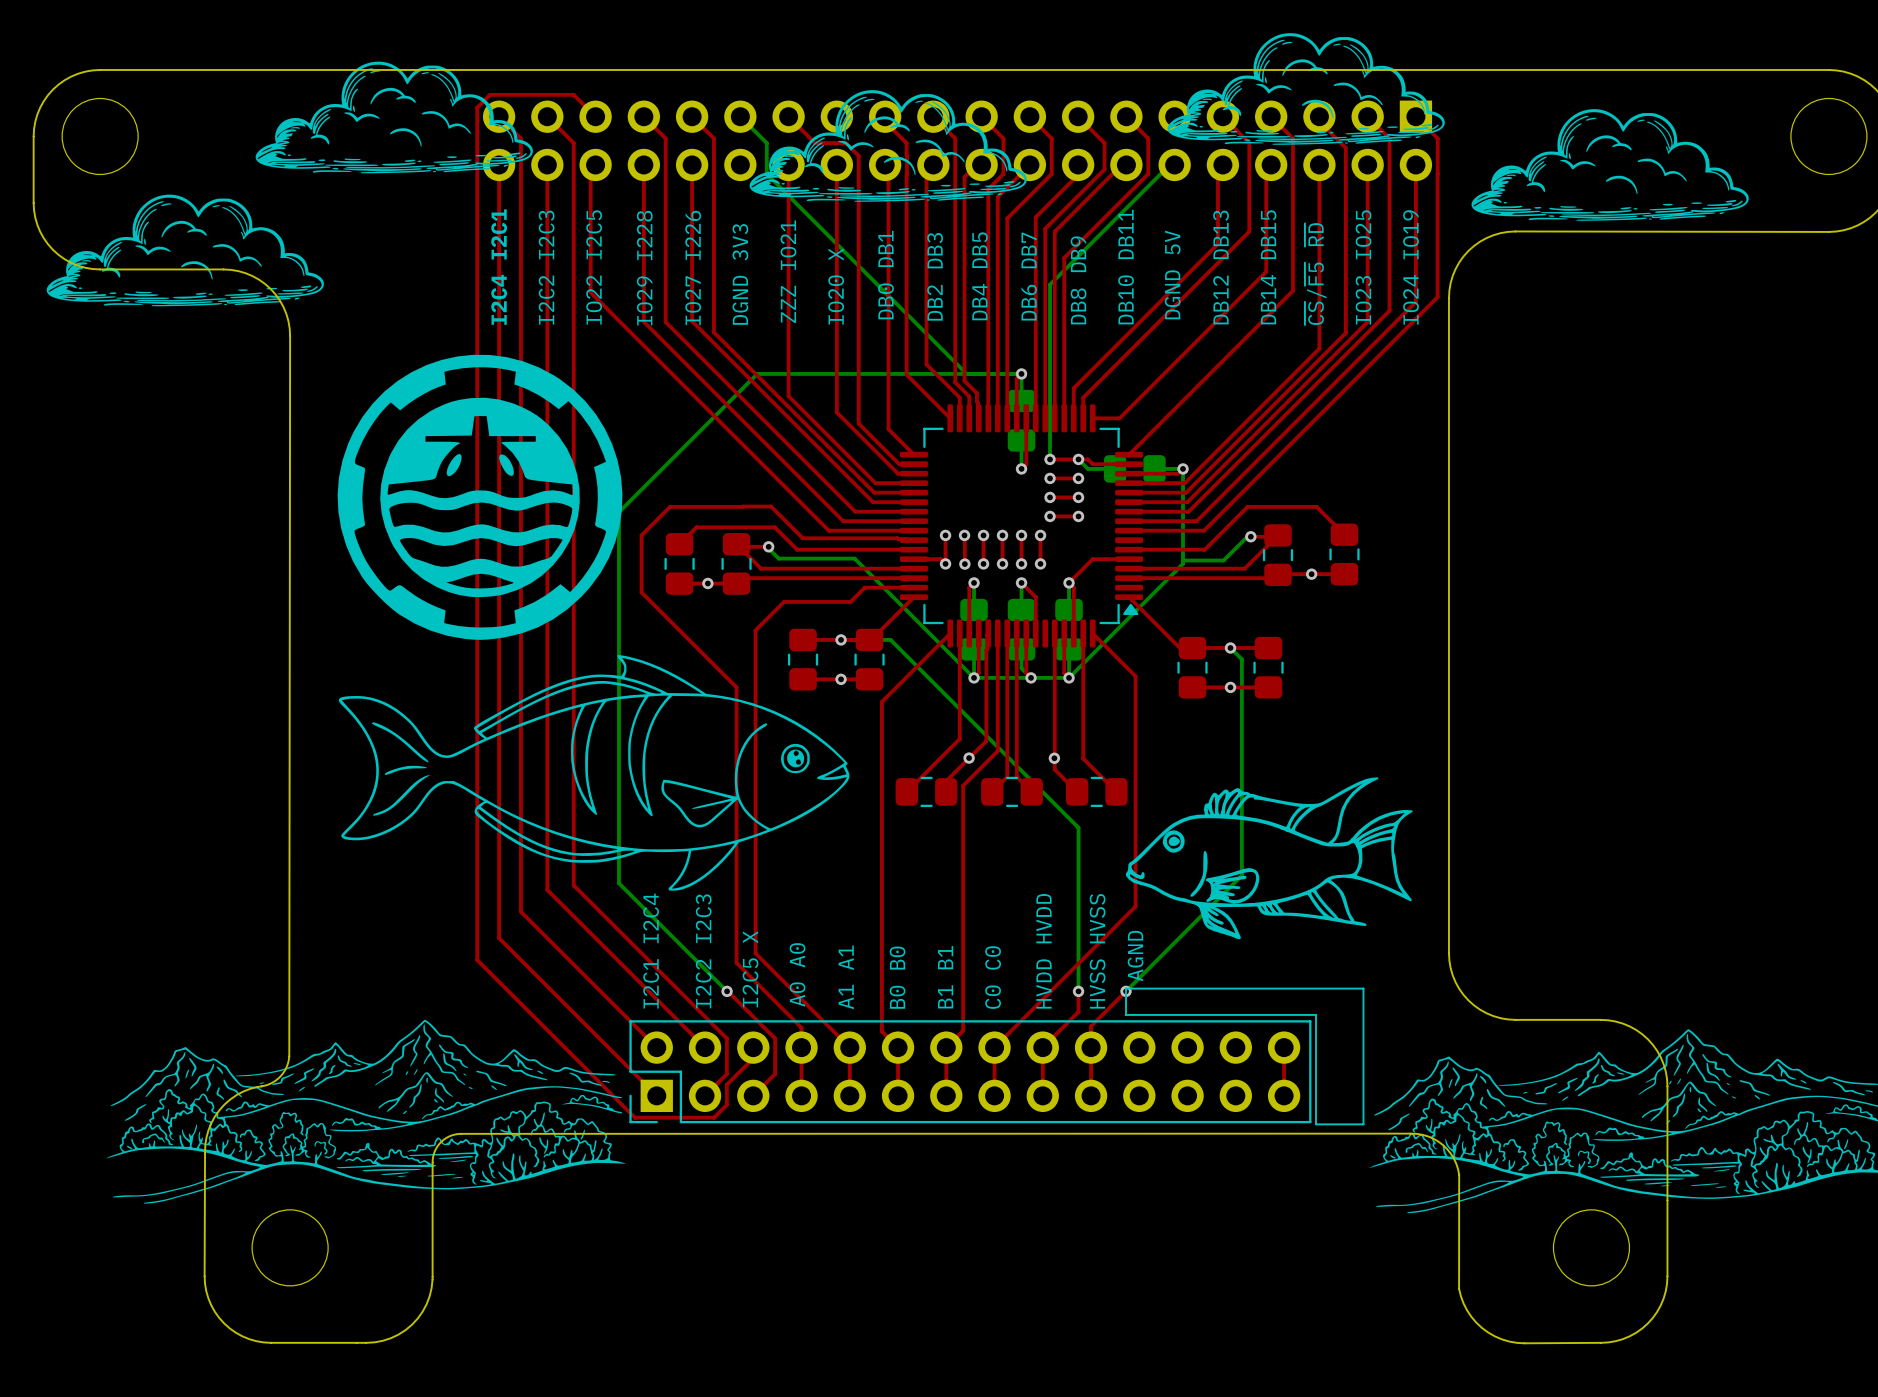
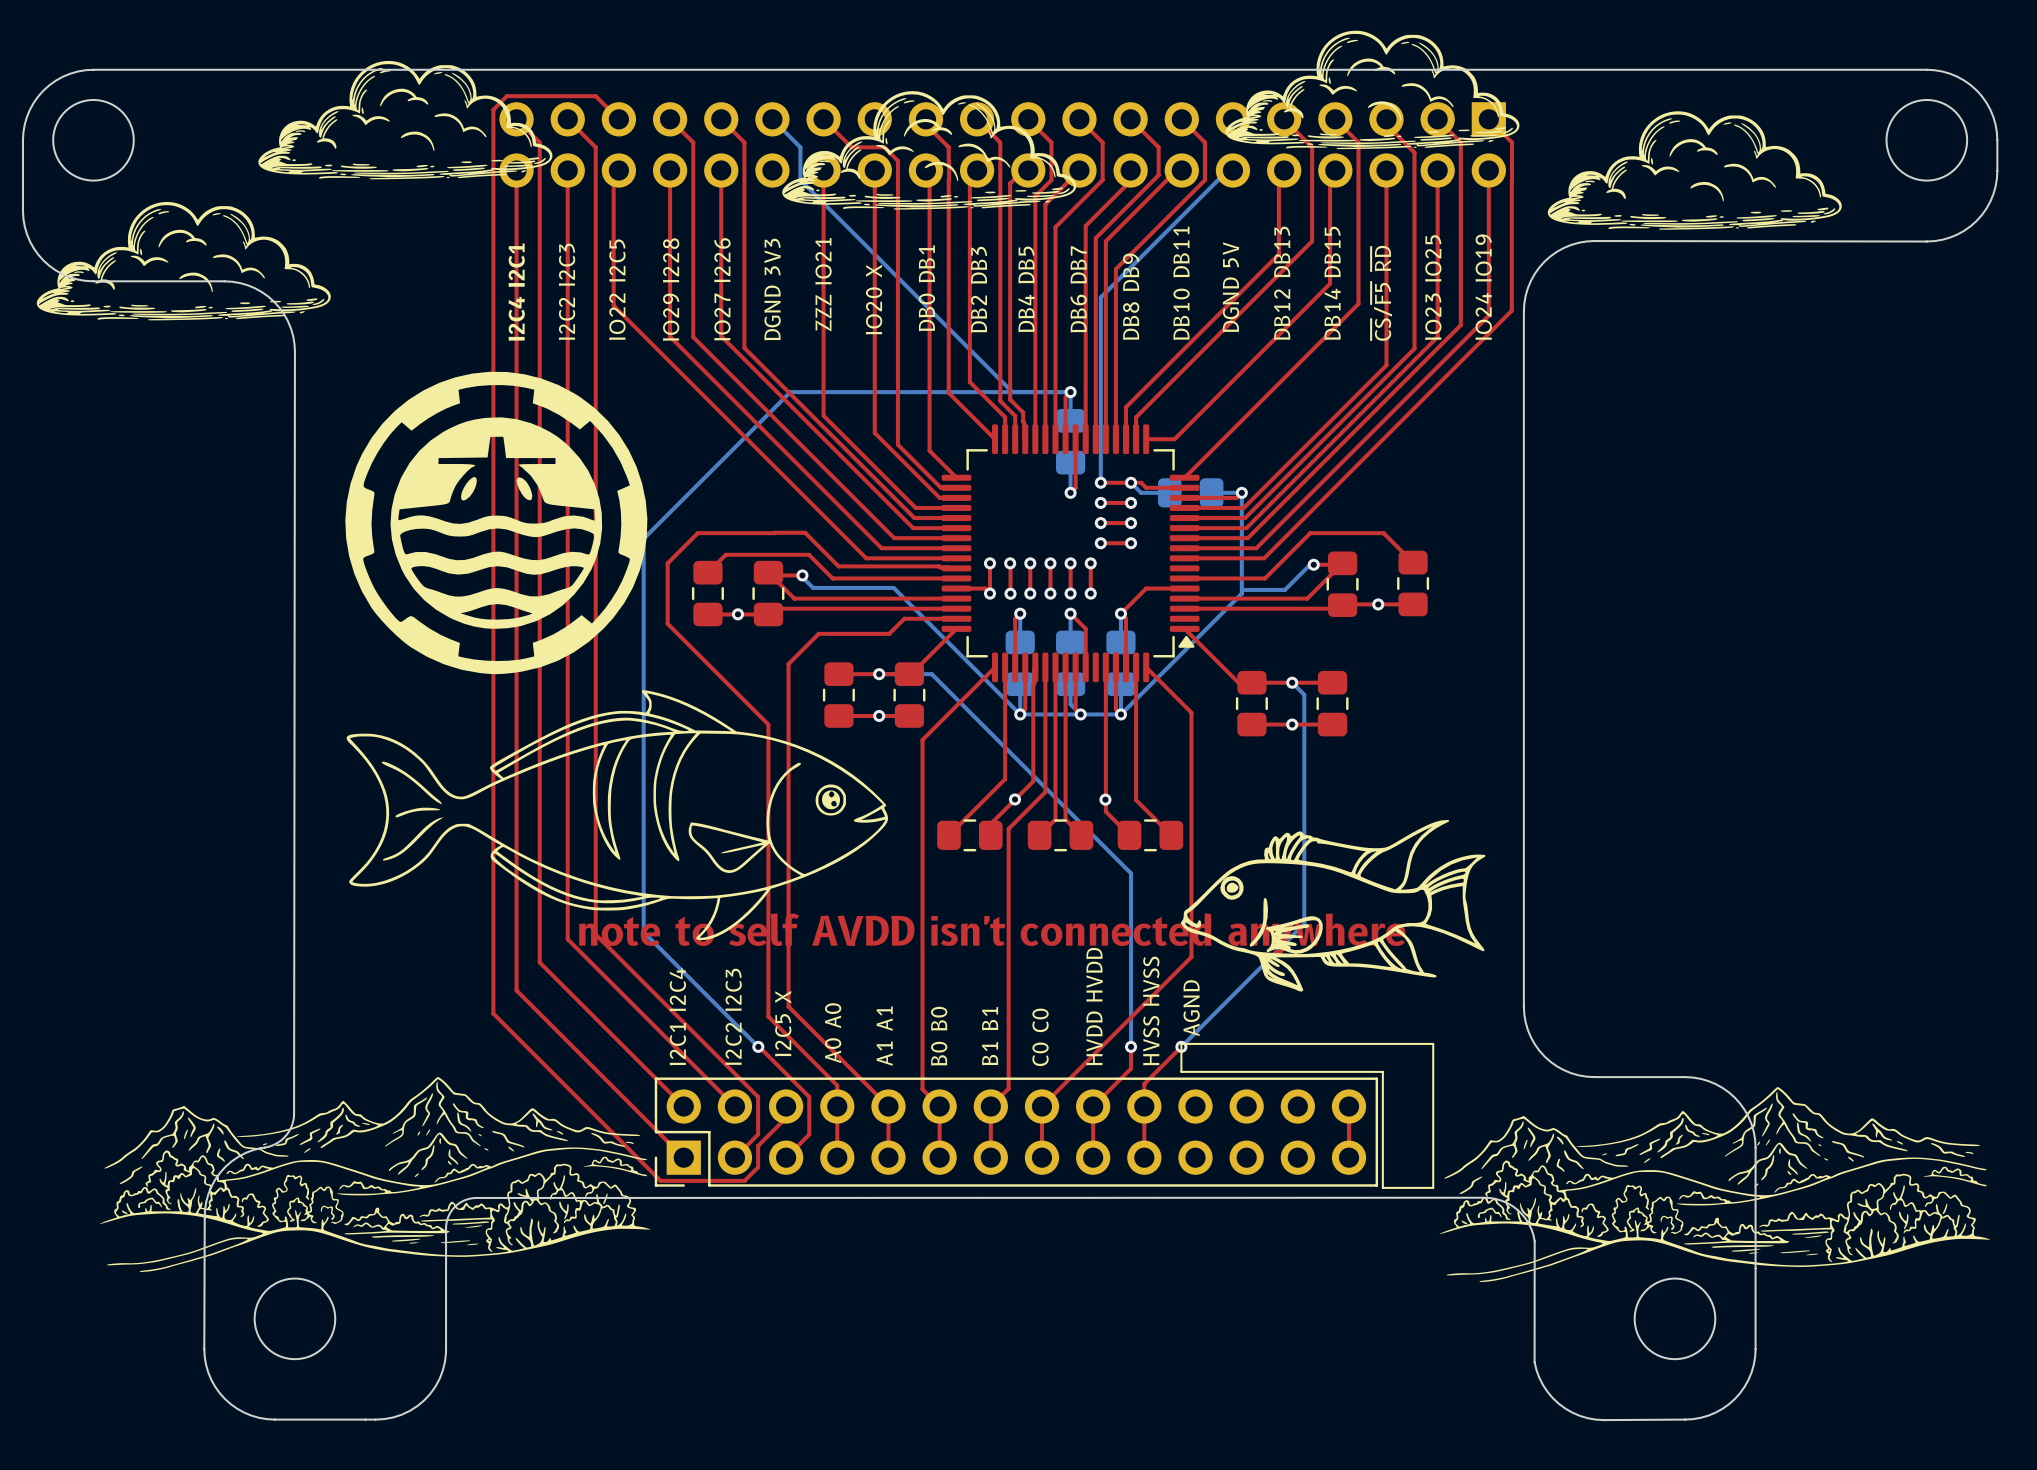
text: none -> note to self AVDD isn't connected anywhere (992, 934)

